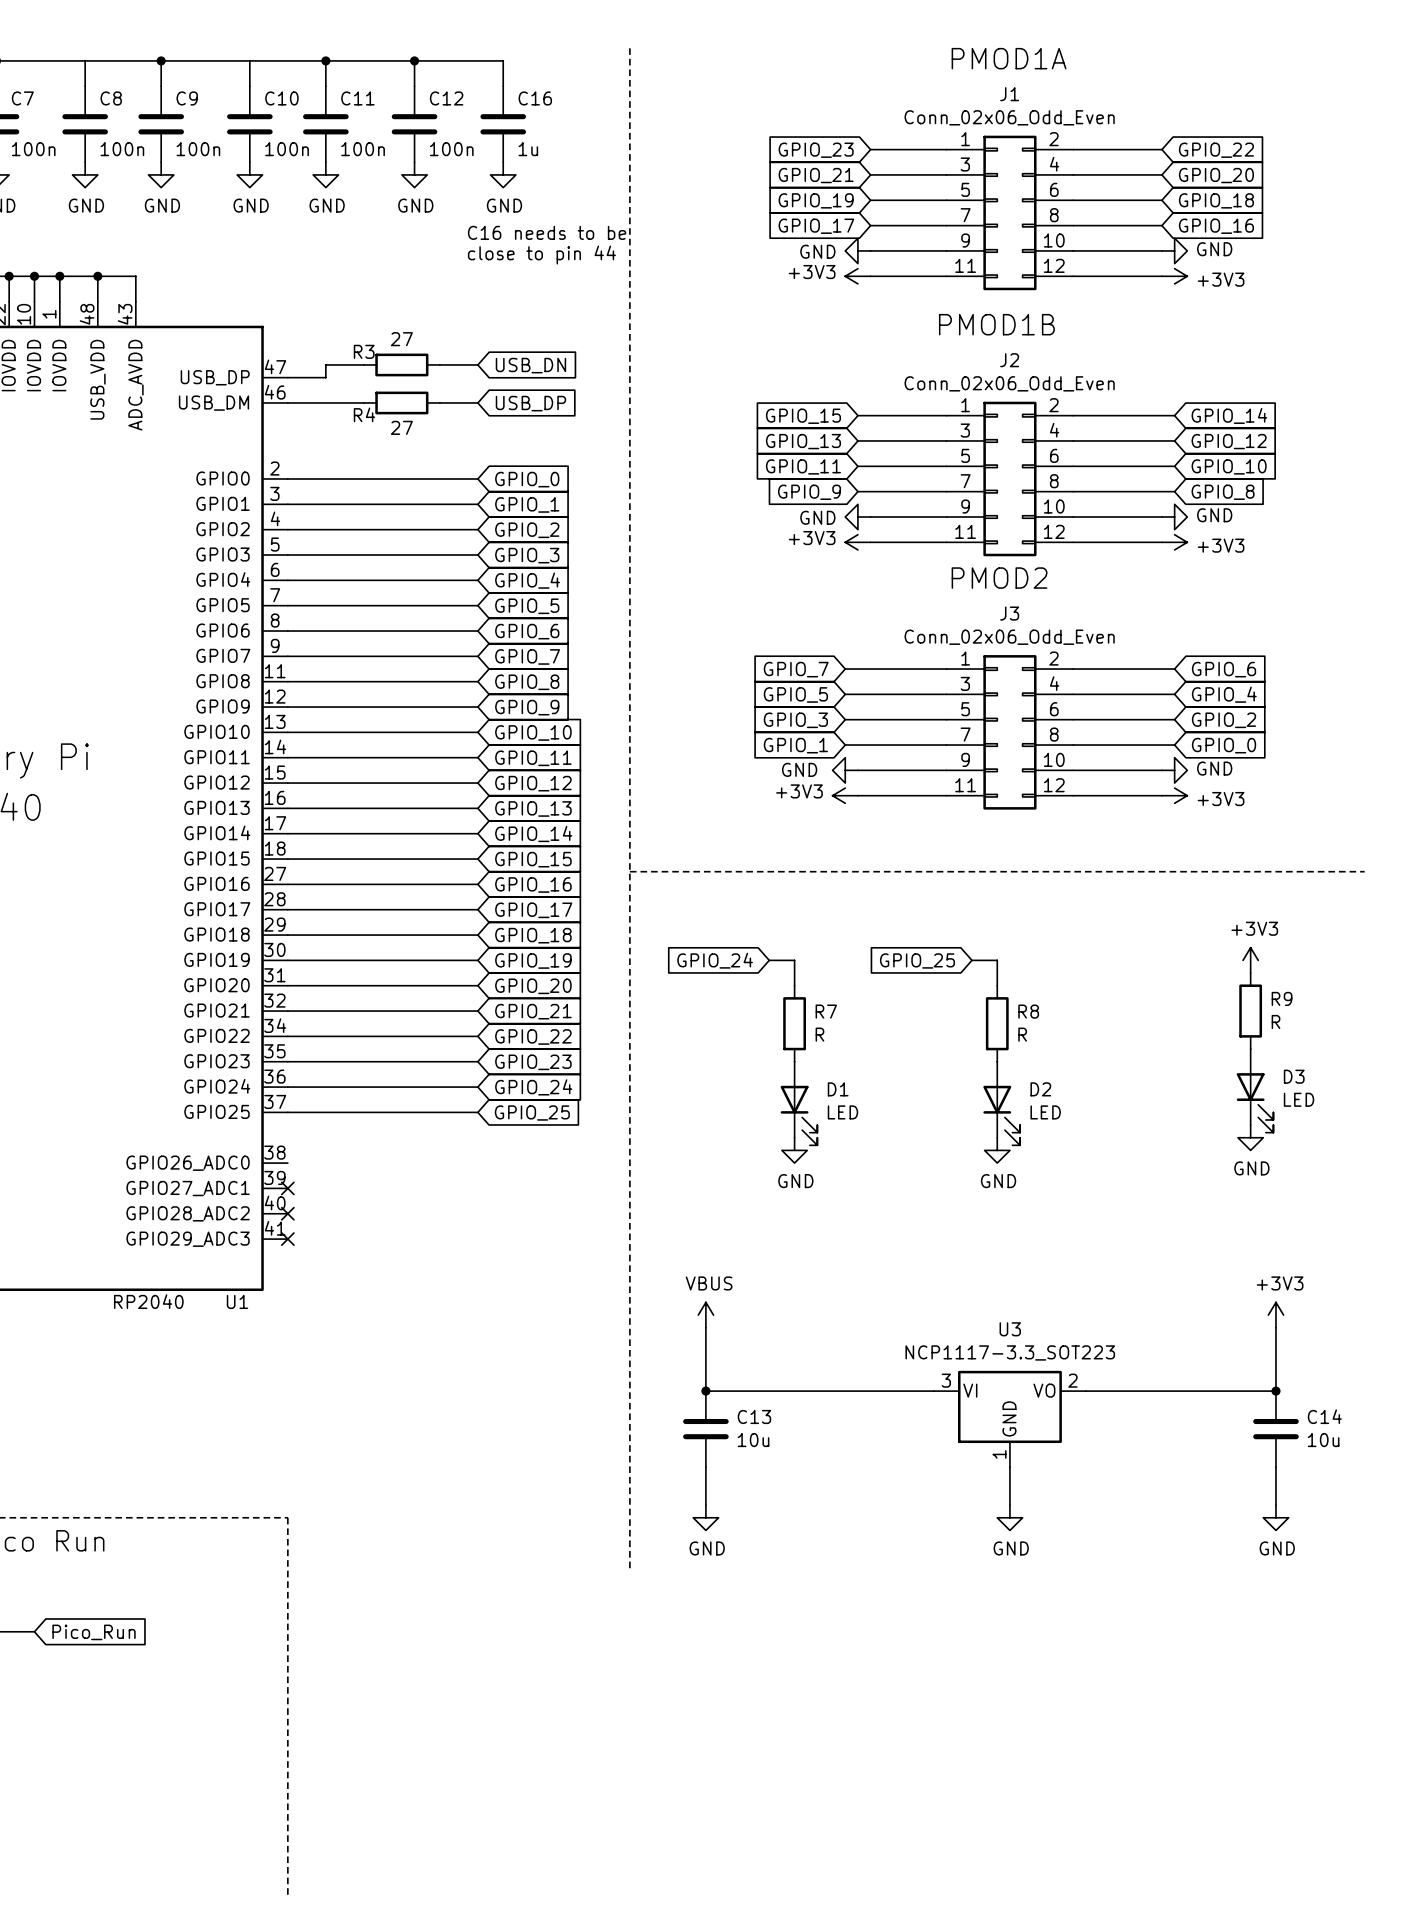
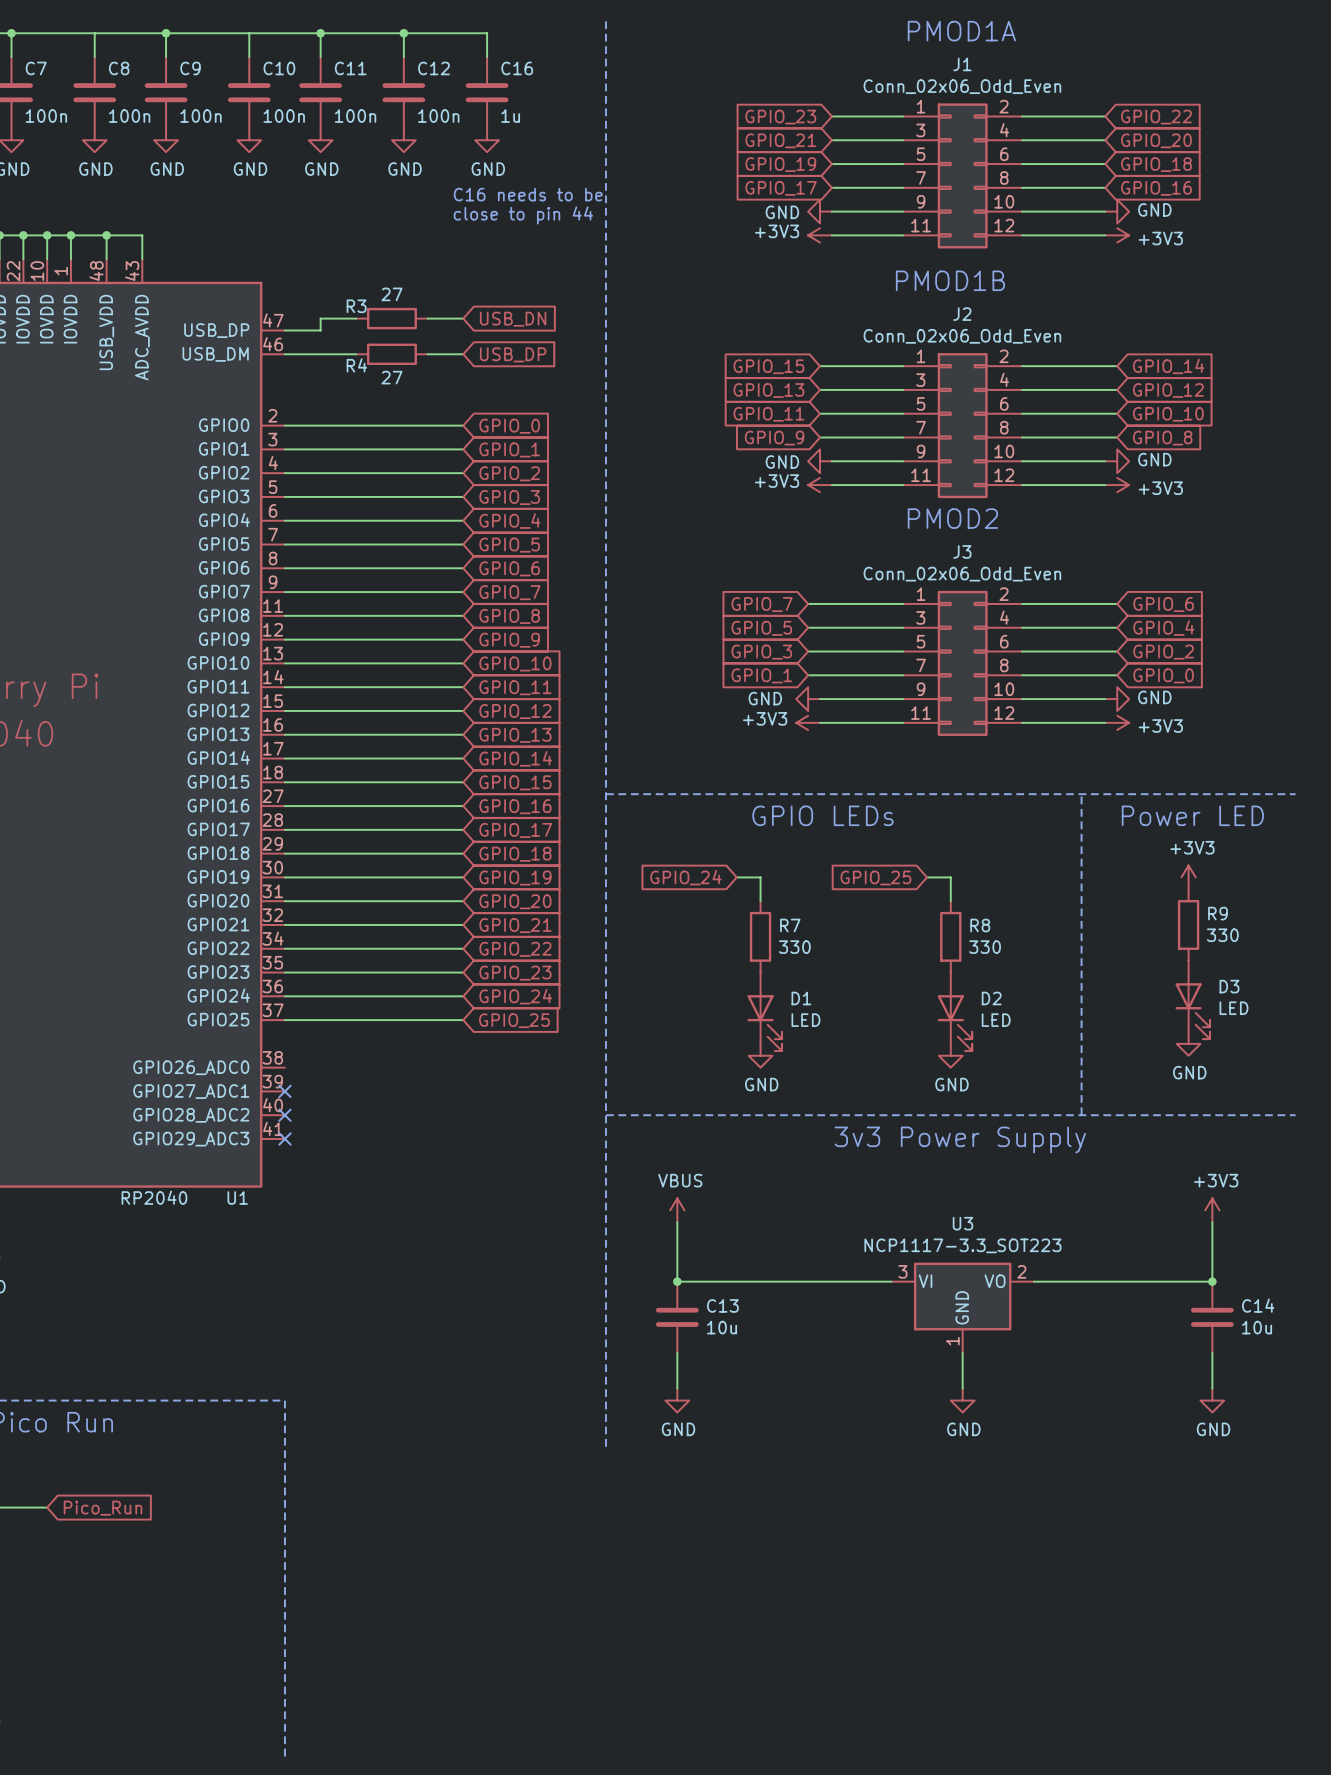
line: none -> (1081, 794) (1081, 1115)
text: none -> GPIO LEDs (822, 815)
text: none -> Power LED (1192, 815)
R9 value: R (1276, 1021) -> 330 (1222, 935)
R7 value: R (819, 1034) -> 330 (794, 947)
R8 value: R (1022, 1034) -> 330 (985, 947)
line: none -> (605, 1115) (1295, 1115)
text: none -> 3v3 Power Supply (960, 1139)

